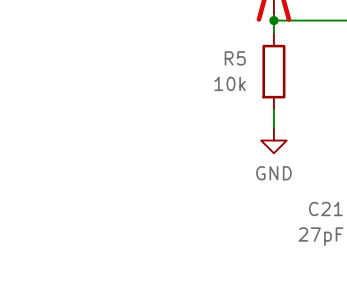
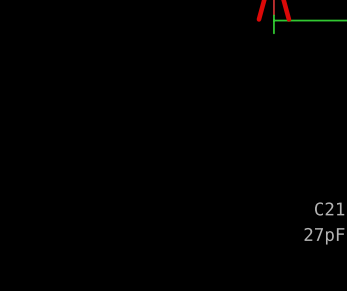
junction: (273, 20) -> none
R5: 10k (273, 71) -> none
wire: (273, 109) (273, 127) -> none
power symbol: GND (273, 140) -> none

